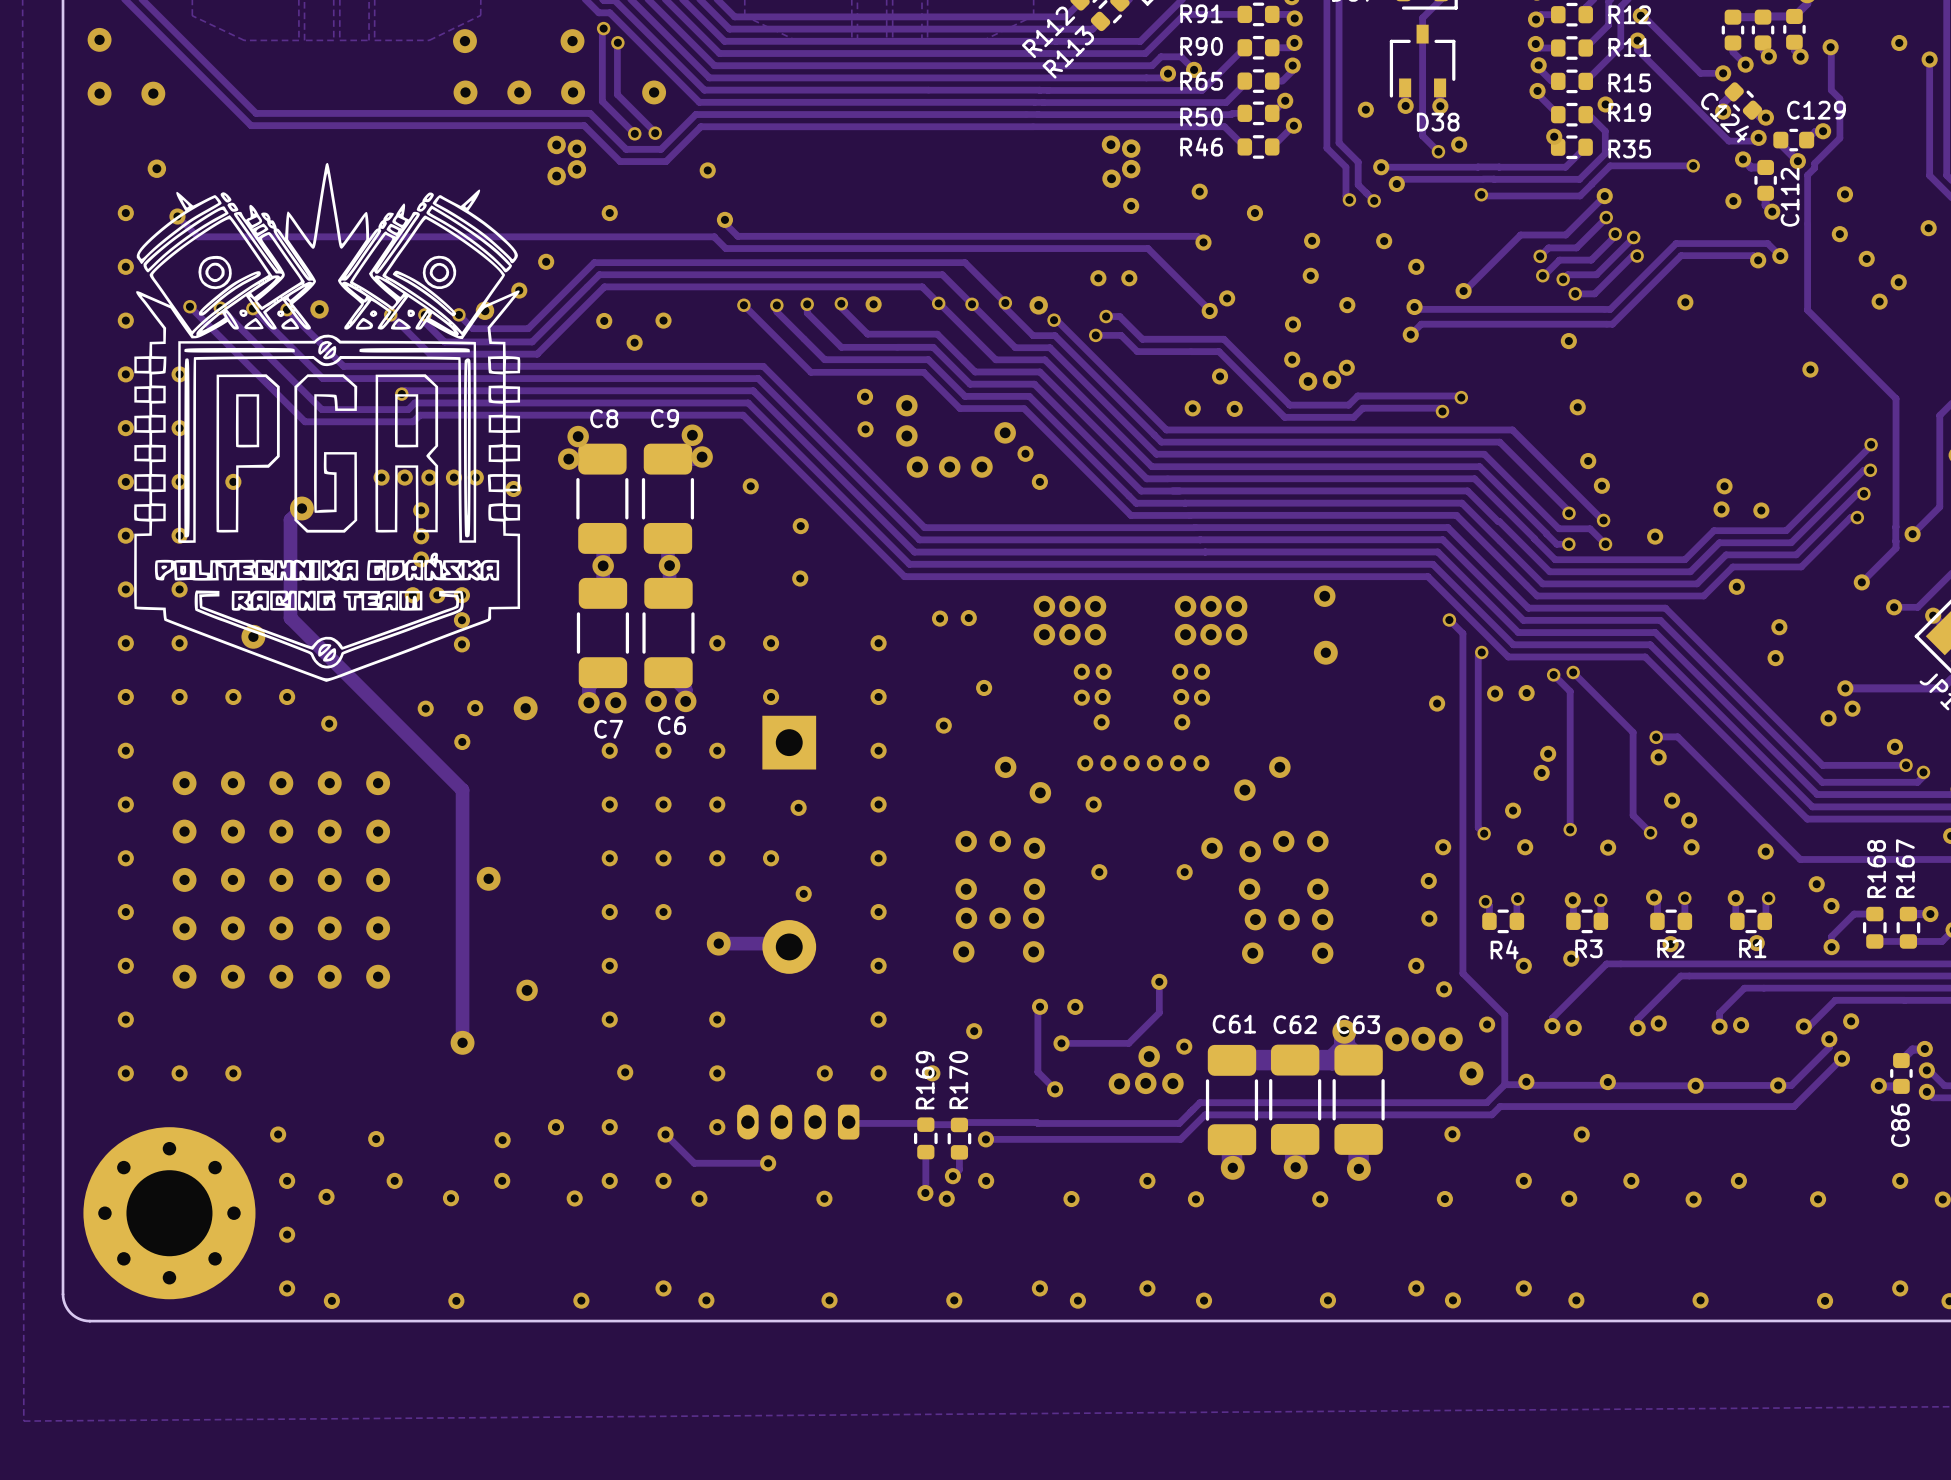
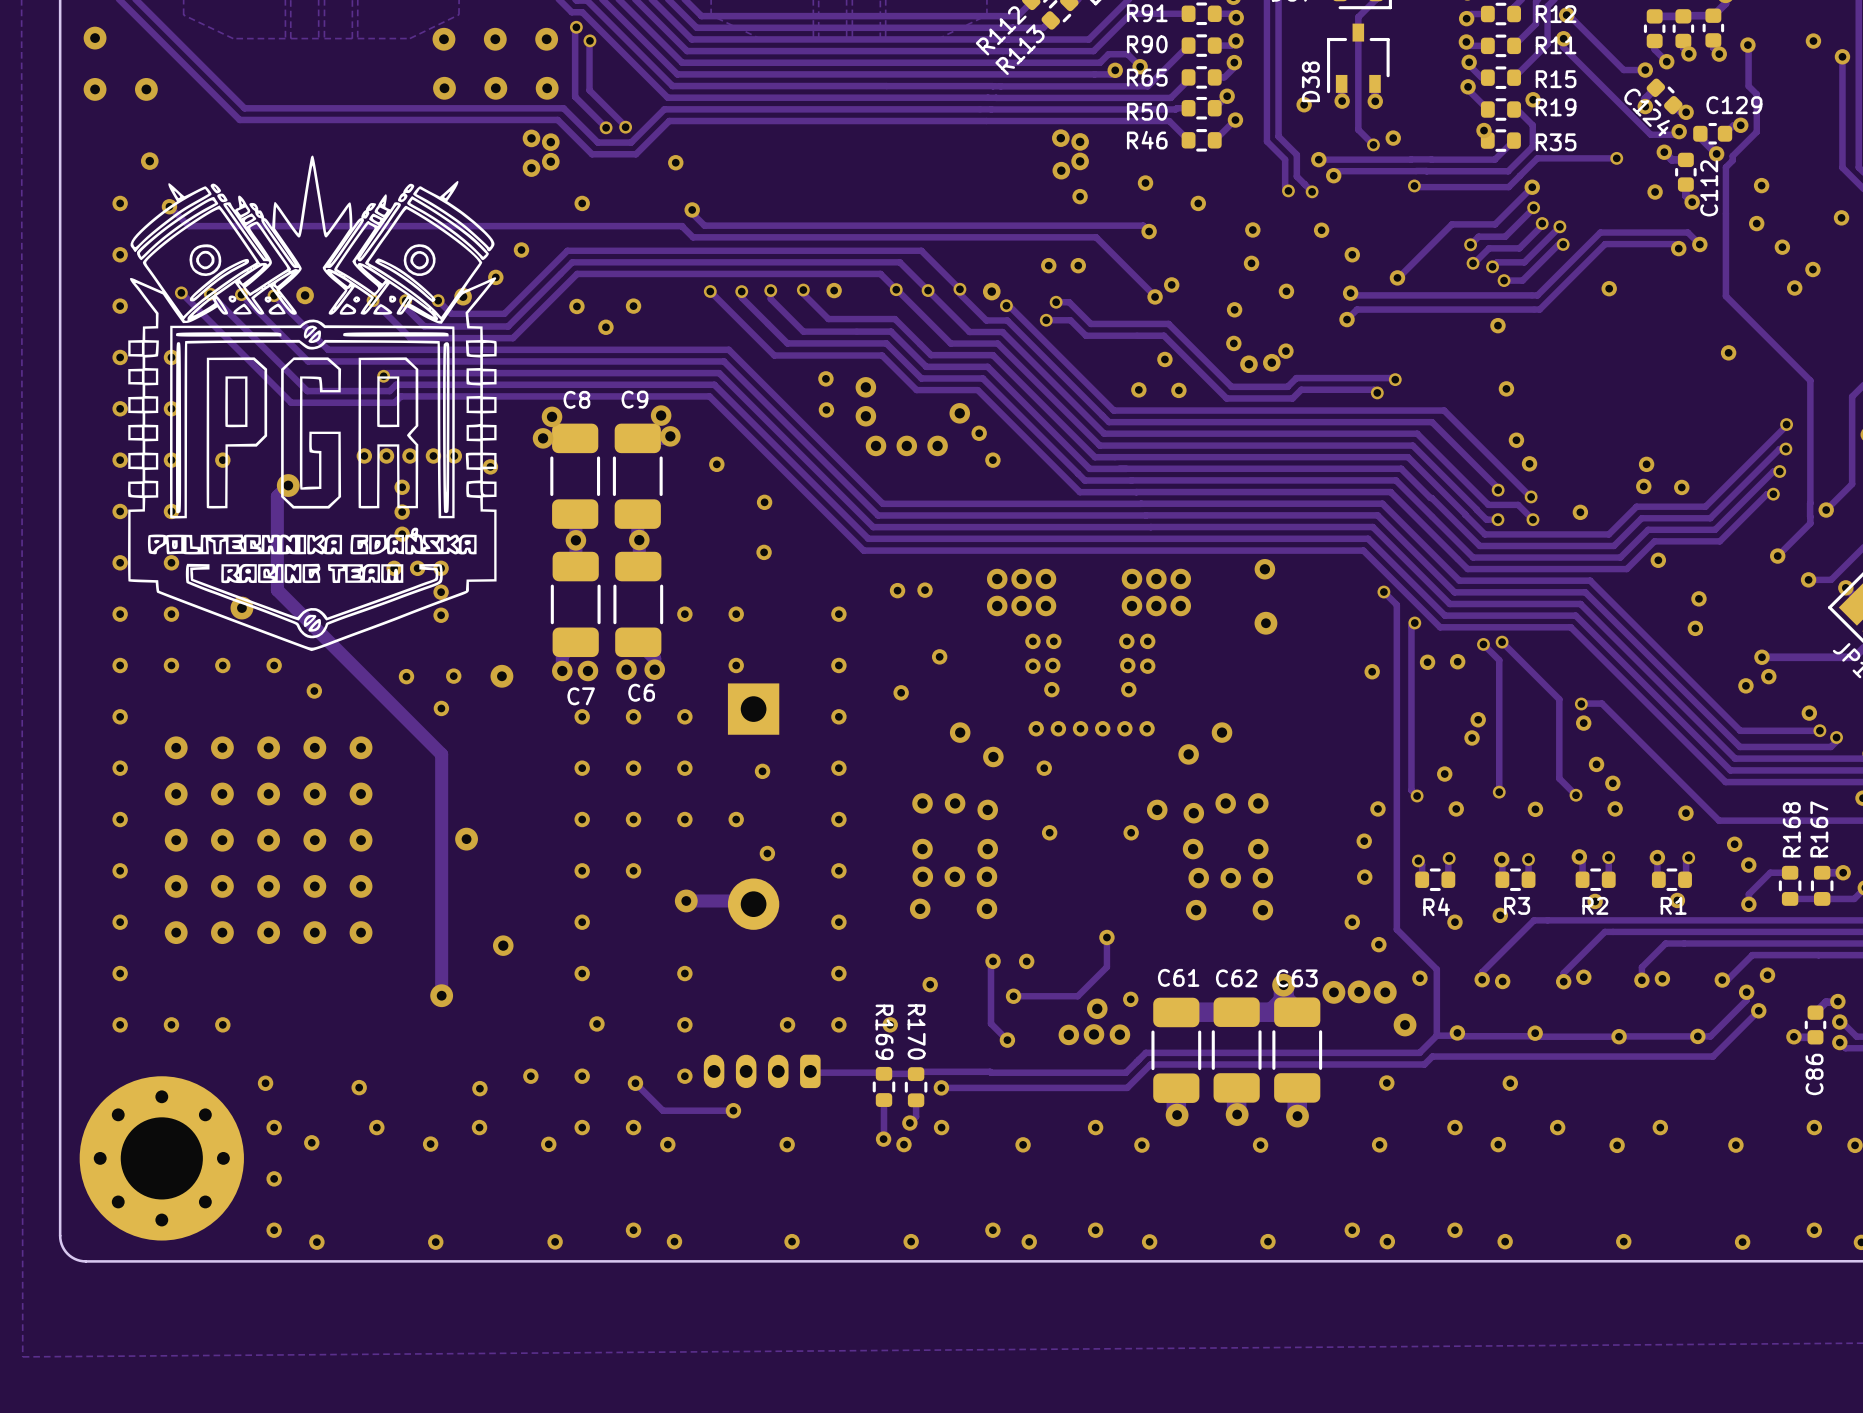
via: none -> (495, 39)
via: (654, 92) -> none
D38 name rotation: 0° (1438, 122) -> 90° counterclockwise (1310, 81)
D38 name position: D38 (1438, 122) -> D38 (1310, 81)
R169 name rotation: 0° (925, 1080) -> 180° (884, 1032)
R170 name rotation: 0° (958, 1080) -> 180° (916, 1032)

